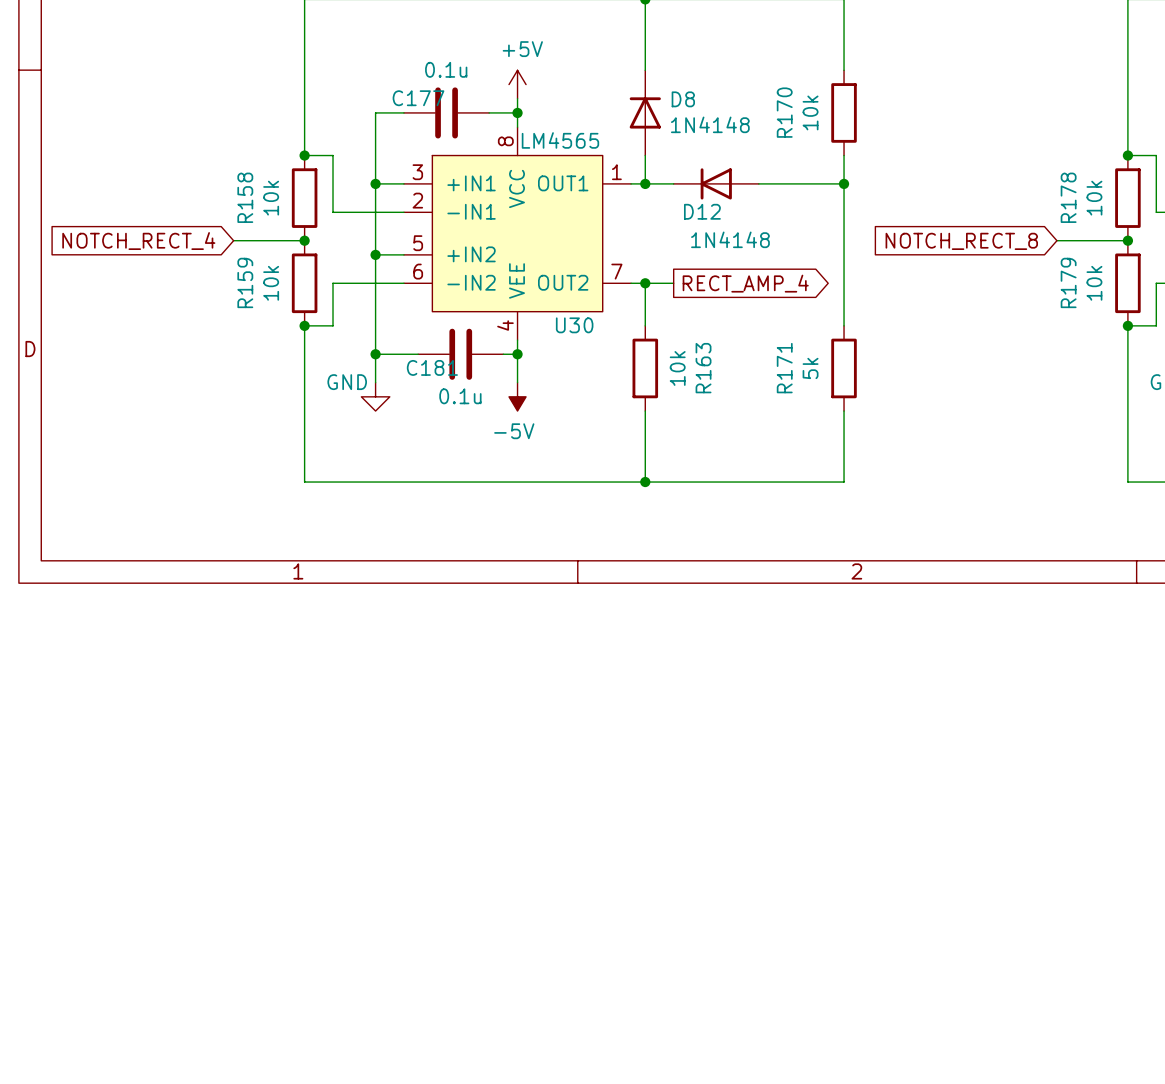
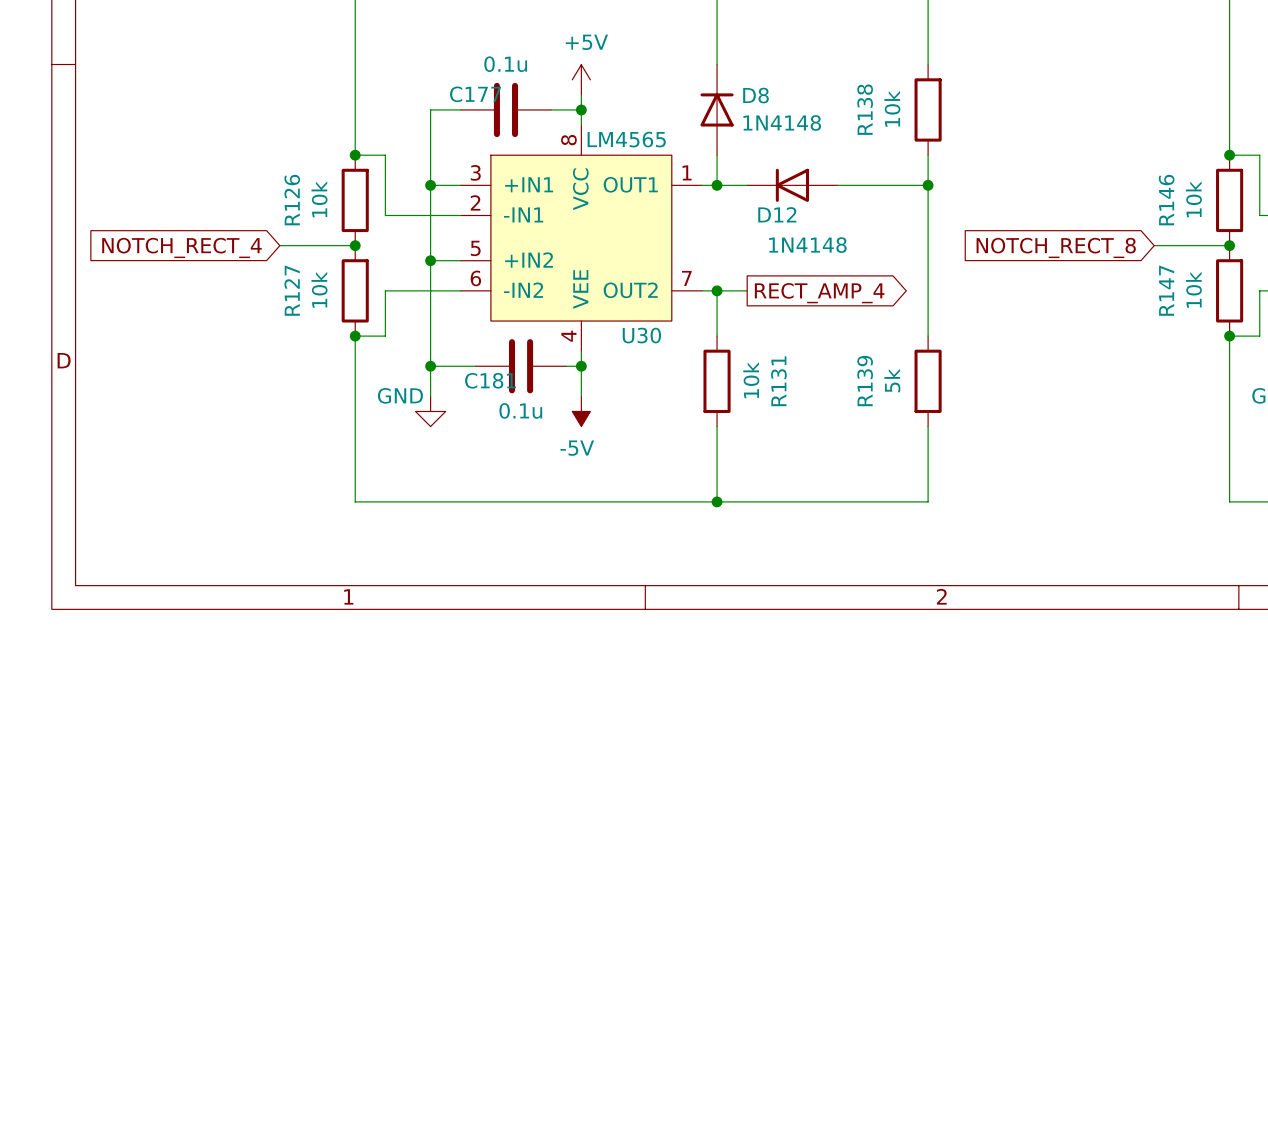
R170 name: R170 (784, 112) -> R138 (865, 109)
R158 name: R158 (245, 197) -> R126 (292, 200)
R178 name: R178 (1068, 197) -> R146 (1166, 200)
R159 name: R159 (245, 282) -> R127 (292, 290)
R179 name: R179 (1068, 282) -> R147 (1166, 290)
R163 name: R163 (703, 368) -> R131 (778, 381)
R171 name: R171 (784, 368) -> R139 (865, 381)

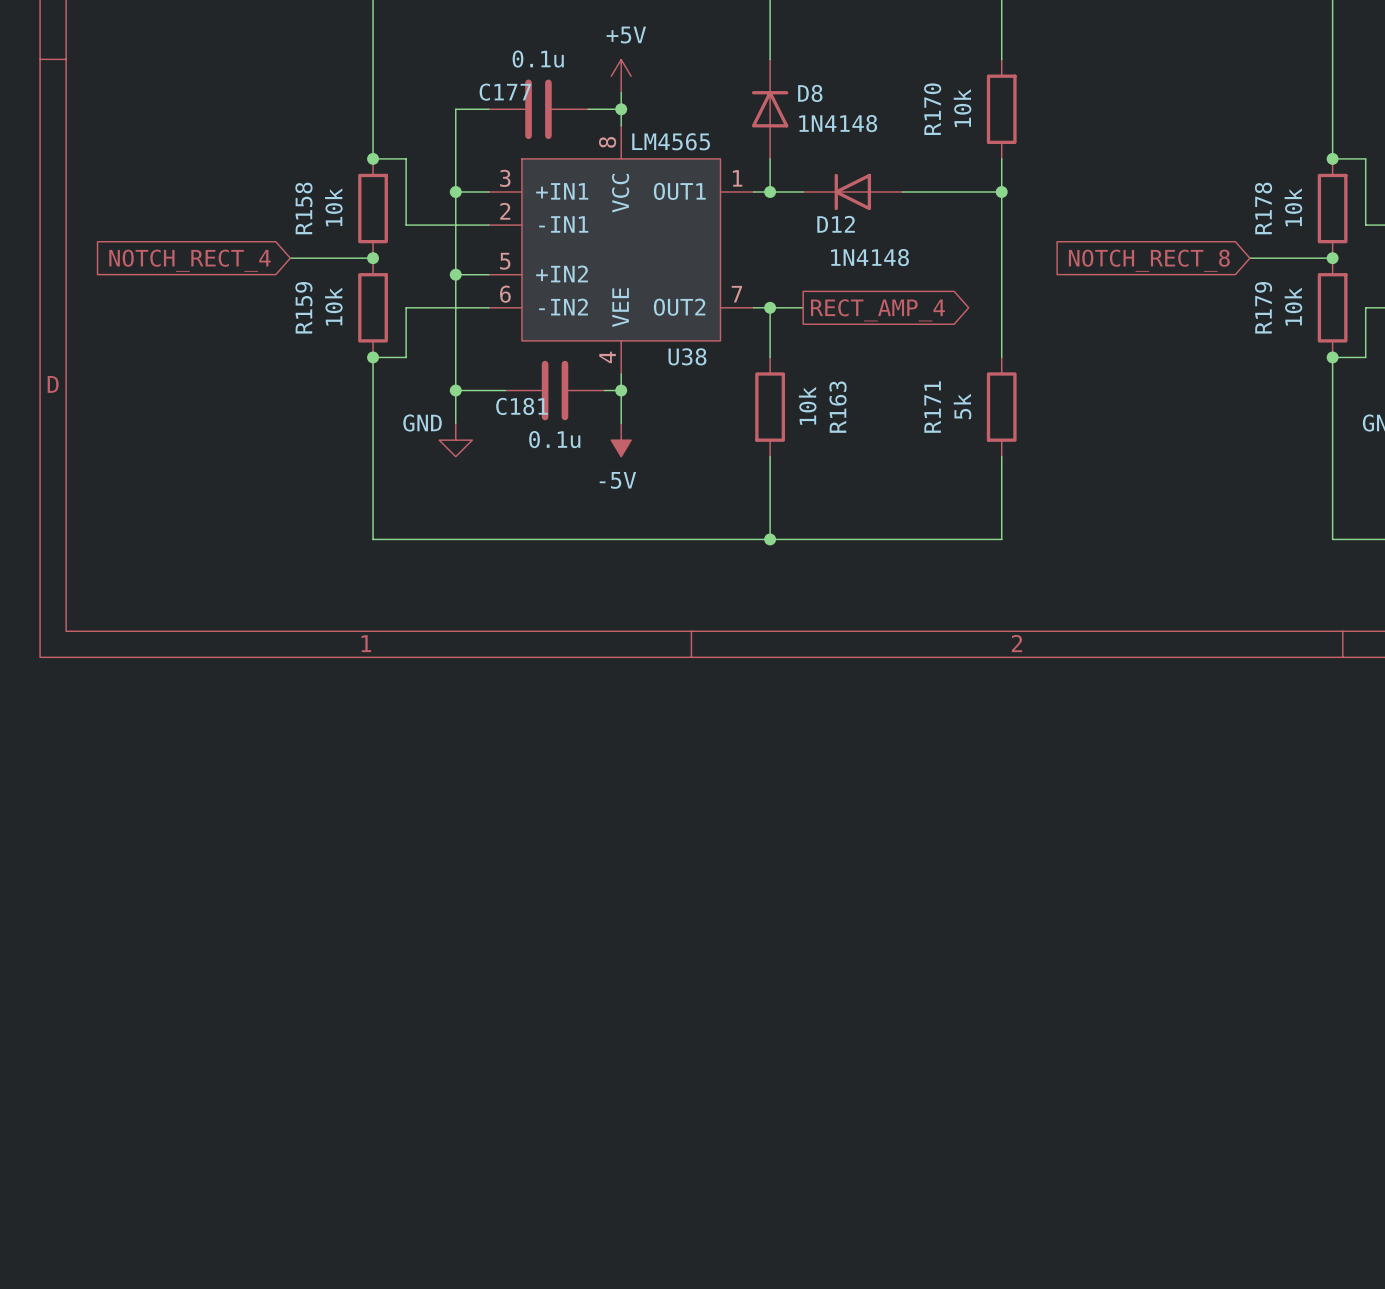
R138 name: R138 (865, 109) -> R170 (932, 109)
R126 name: R126 (292, 200) -> R158 (303, 208)
R146 name: R146 (1166, 200) -> R178 (1263, 208)
R127 name: R127 (292, 290) -> R159 (303, 307)
R147 name: R147 (1166, 290) -> R179 (1263, 307)
U30 name: U30 (641, 335) -> U38 (687, 356)
R131 name: R131 (778, 381) -> R163 (837, 407)
R139 name: R139 (865, 381) -> R171 (932, 407)

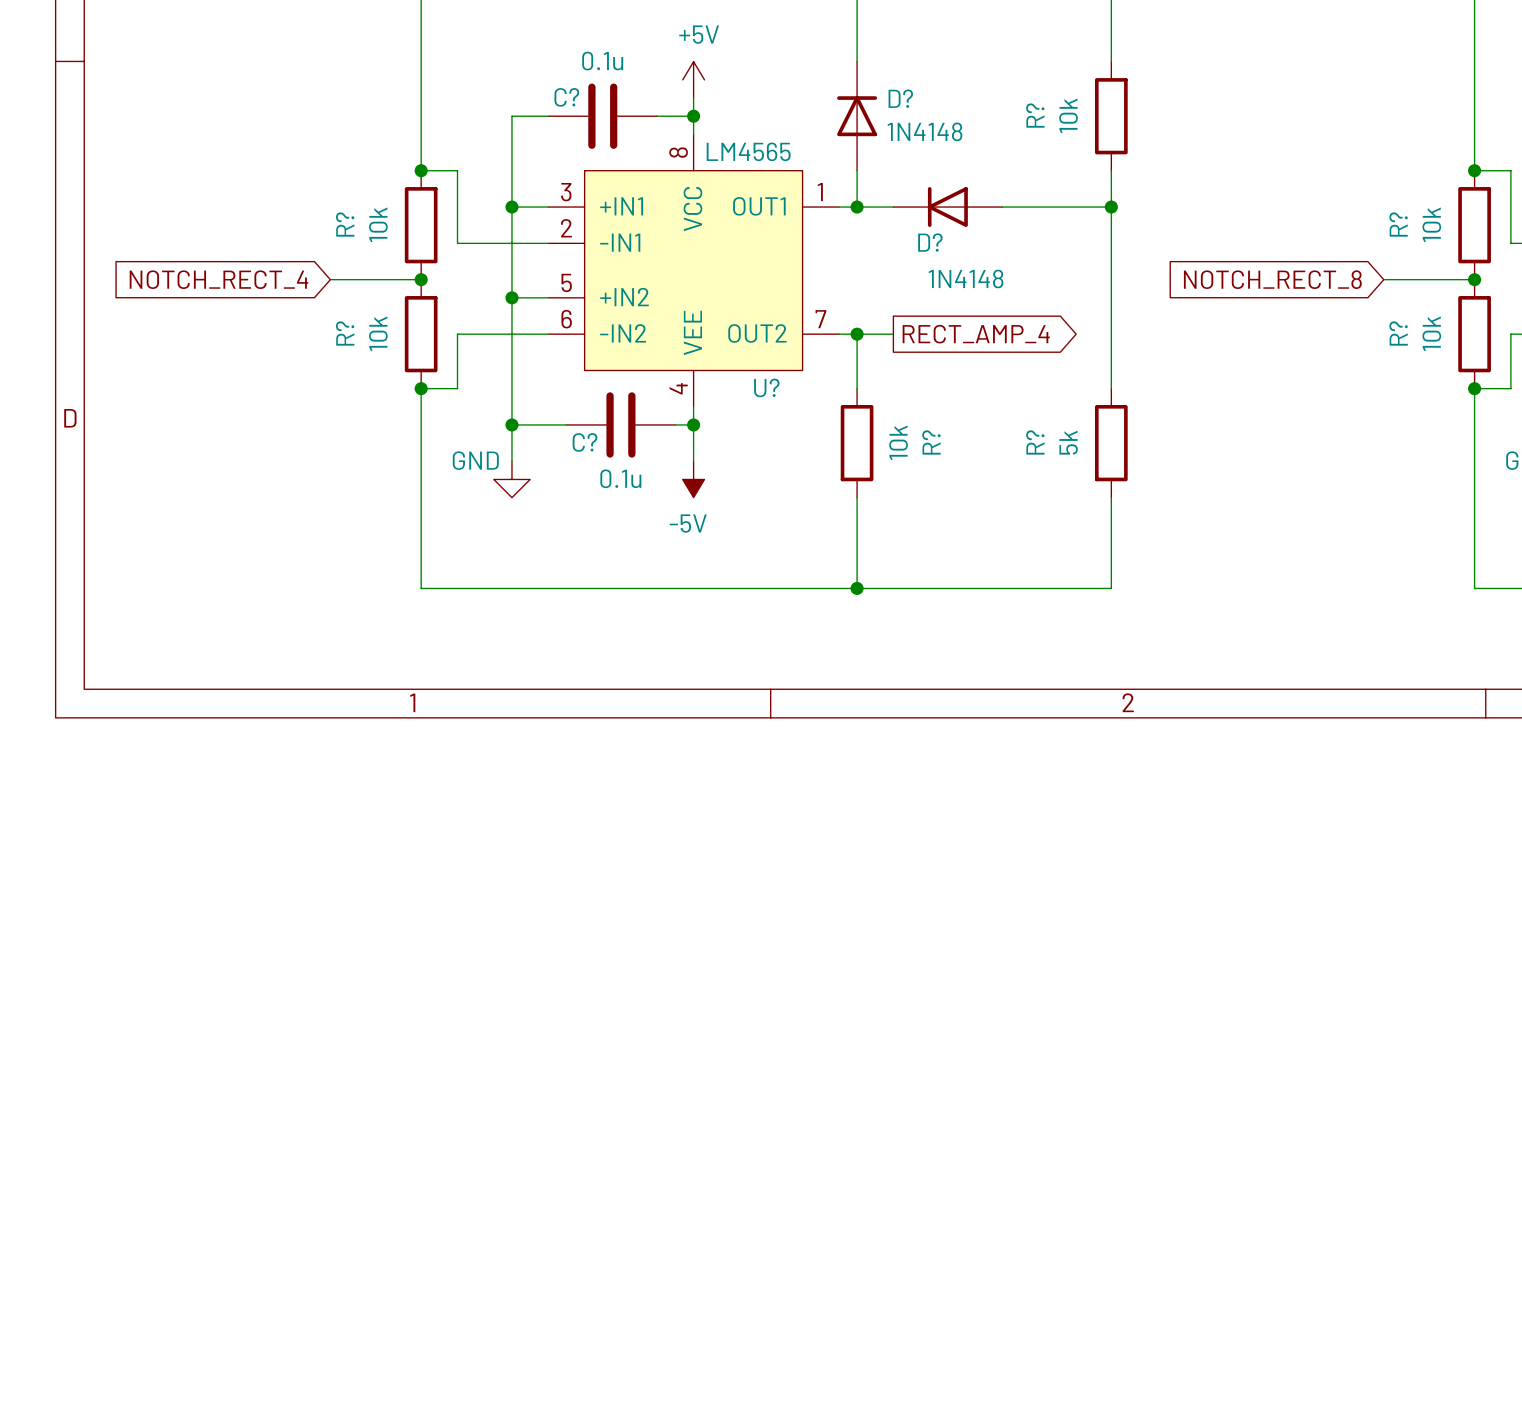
C177 name: C177 (505, 92) -> C? (566, 97)
D8 name: D8 (810, 93) -> D? (900, 98)
R170 name: R170 (932, 109) -> R? (1035, 115)
R158 name: R158 (303, 208) -> R? (345, 224)
R178 name: R178 (1263, 208) -> R? (1398, 224)
D12 name: D12 (836, 224) -> D? (930, 242)
R159 name: R159 (303, 307) -> R? (345, 333)
R179 name: R179 (1263, 307) -> R? (1398, 333)
U38 name: U38 (687, 356) -> U? (766, 387)
C181 name: C181 (521, 406) -> C? (585, 442)
R163 name: R163 (837, 407) -> R? (931, 442)
R171 name: R171 (932, 407) -> R? (1035, 442)

